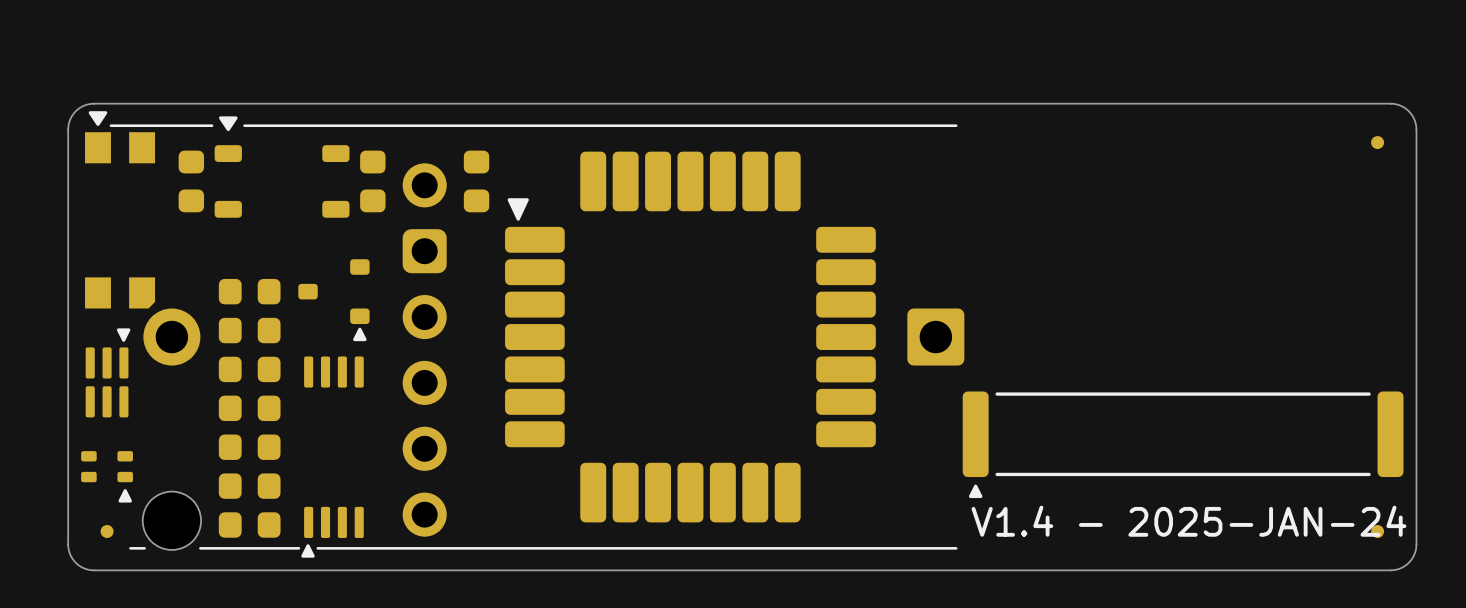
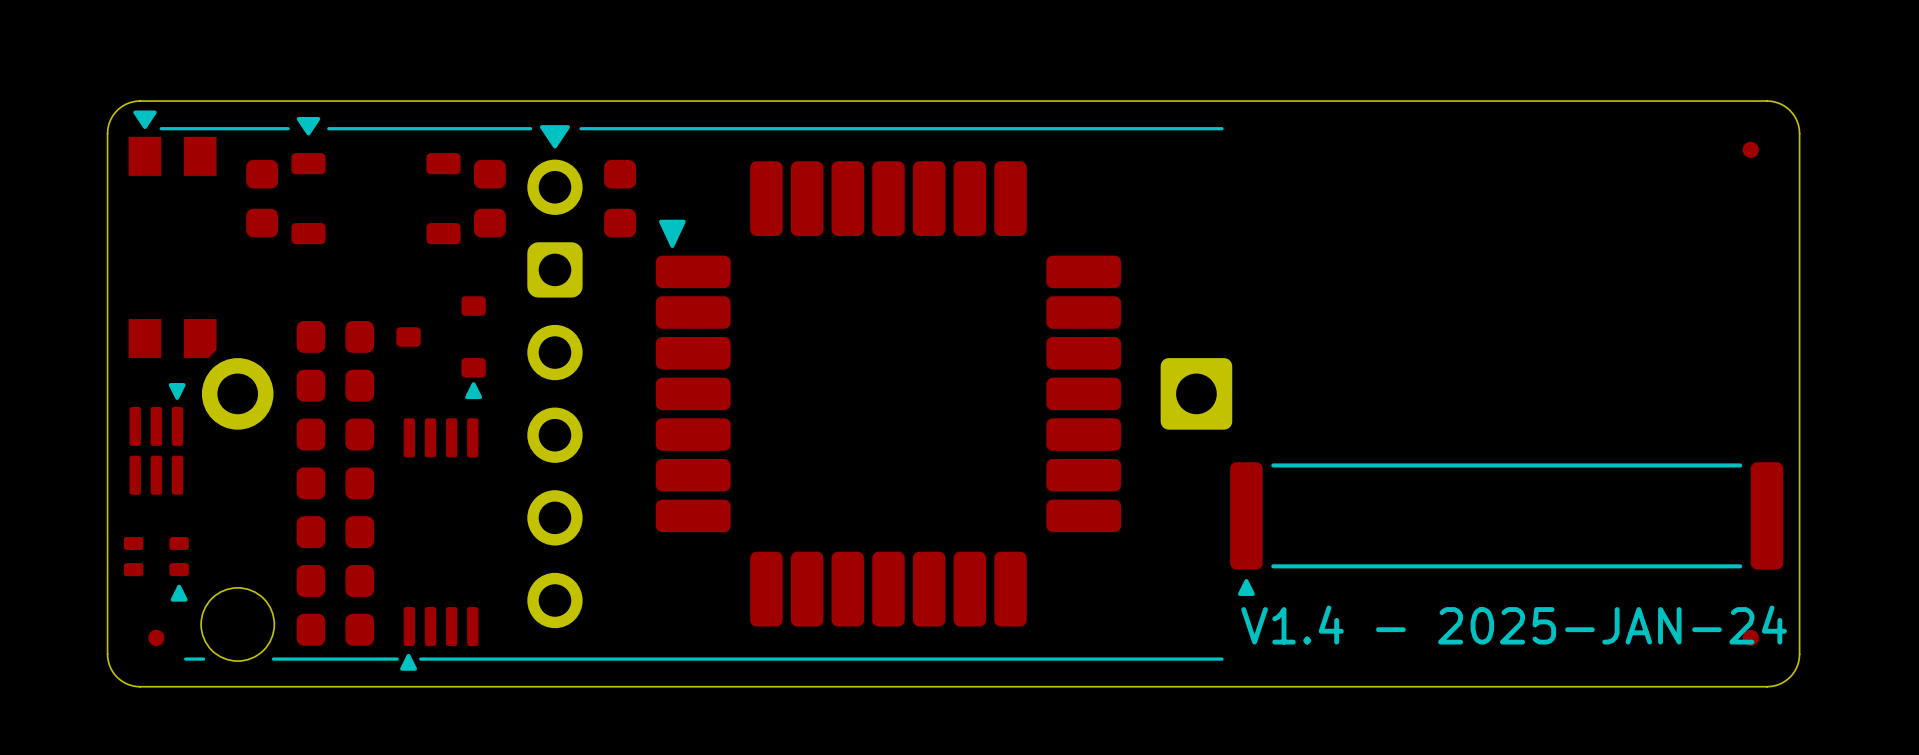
line: (405, 125) (445, 125) -> none
part: none -> (554, 376)
part: (424, 349) -> none

